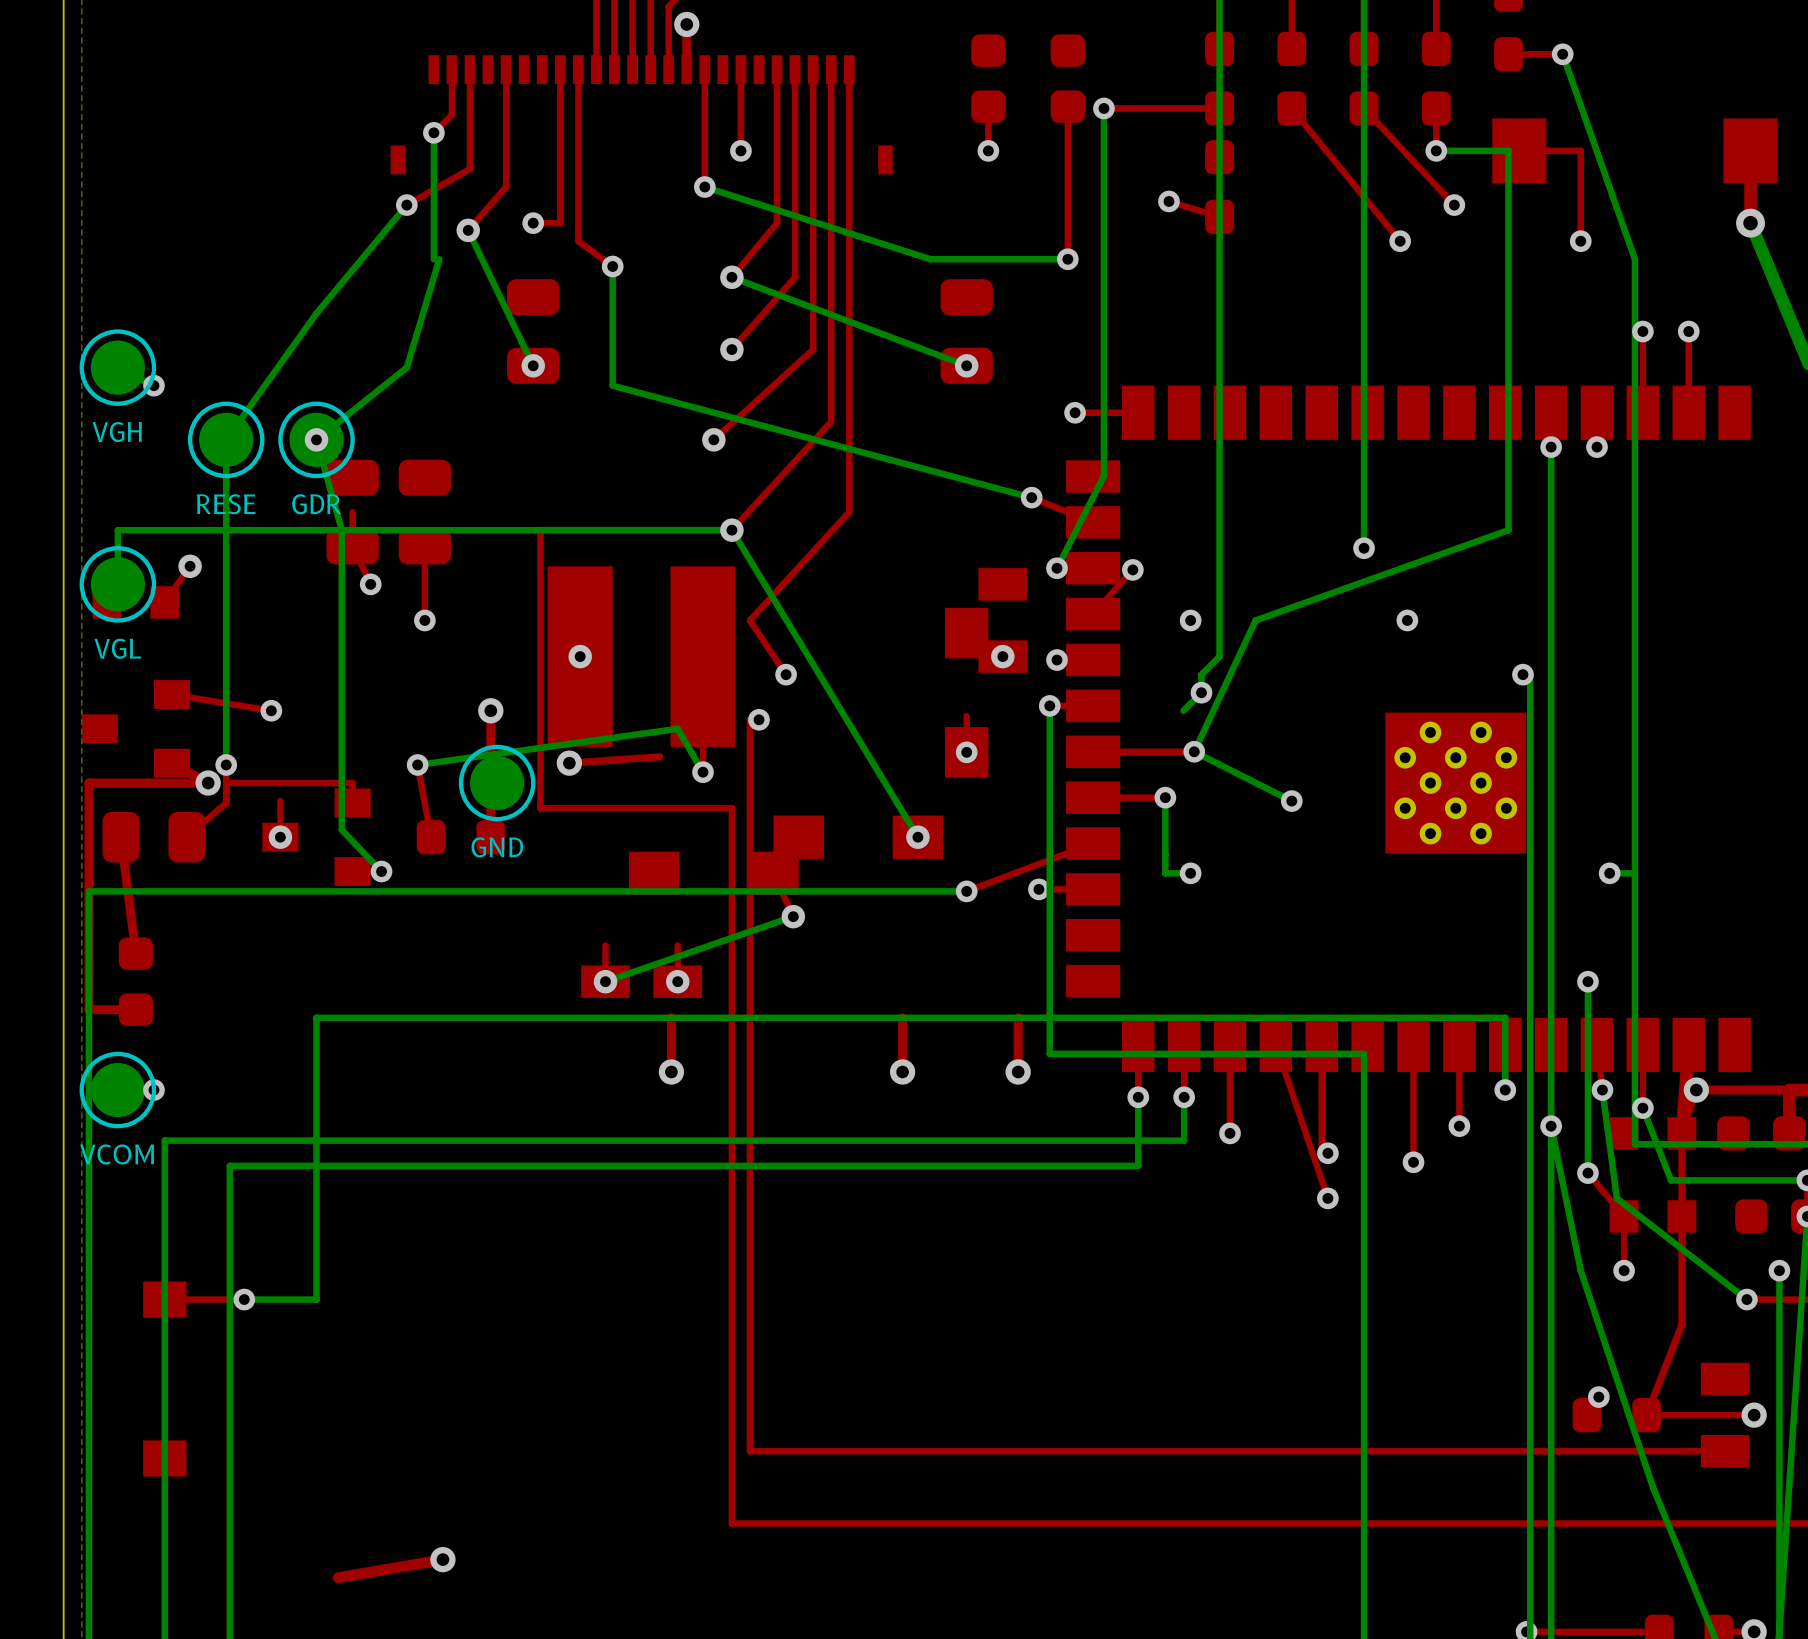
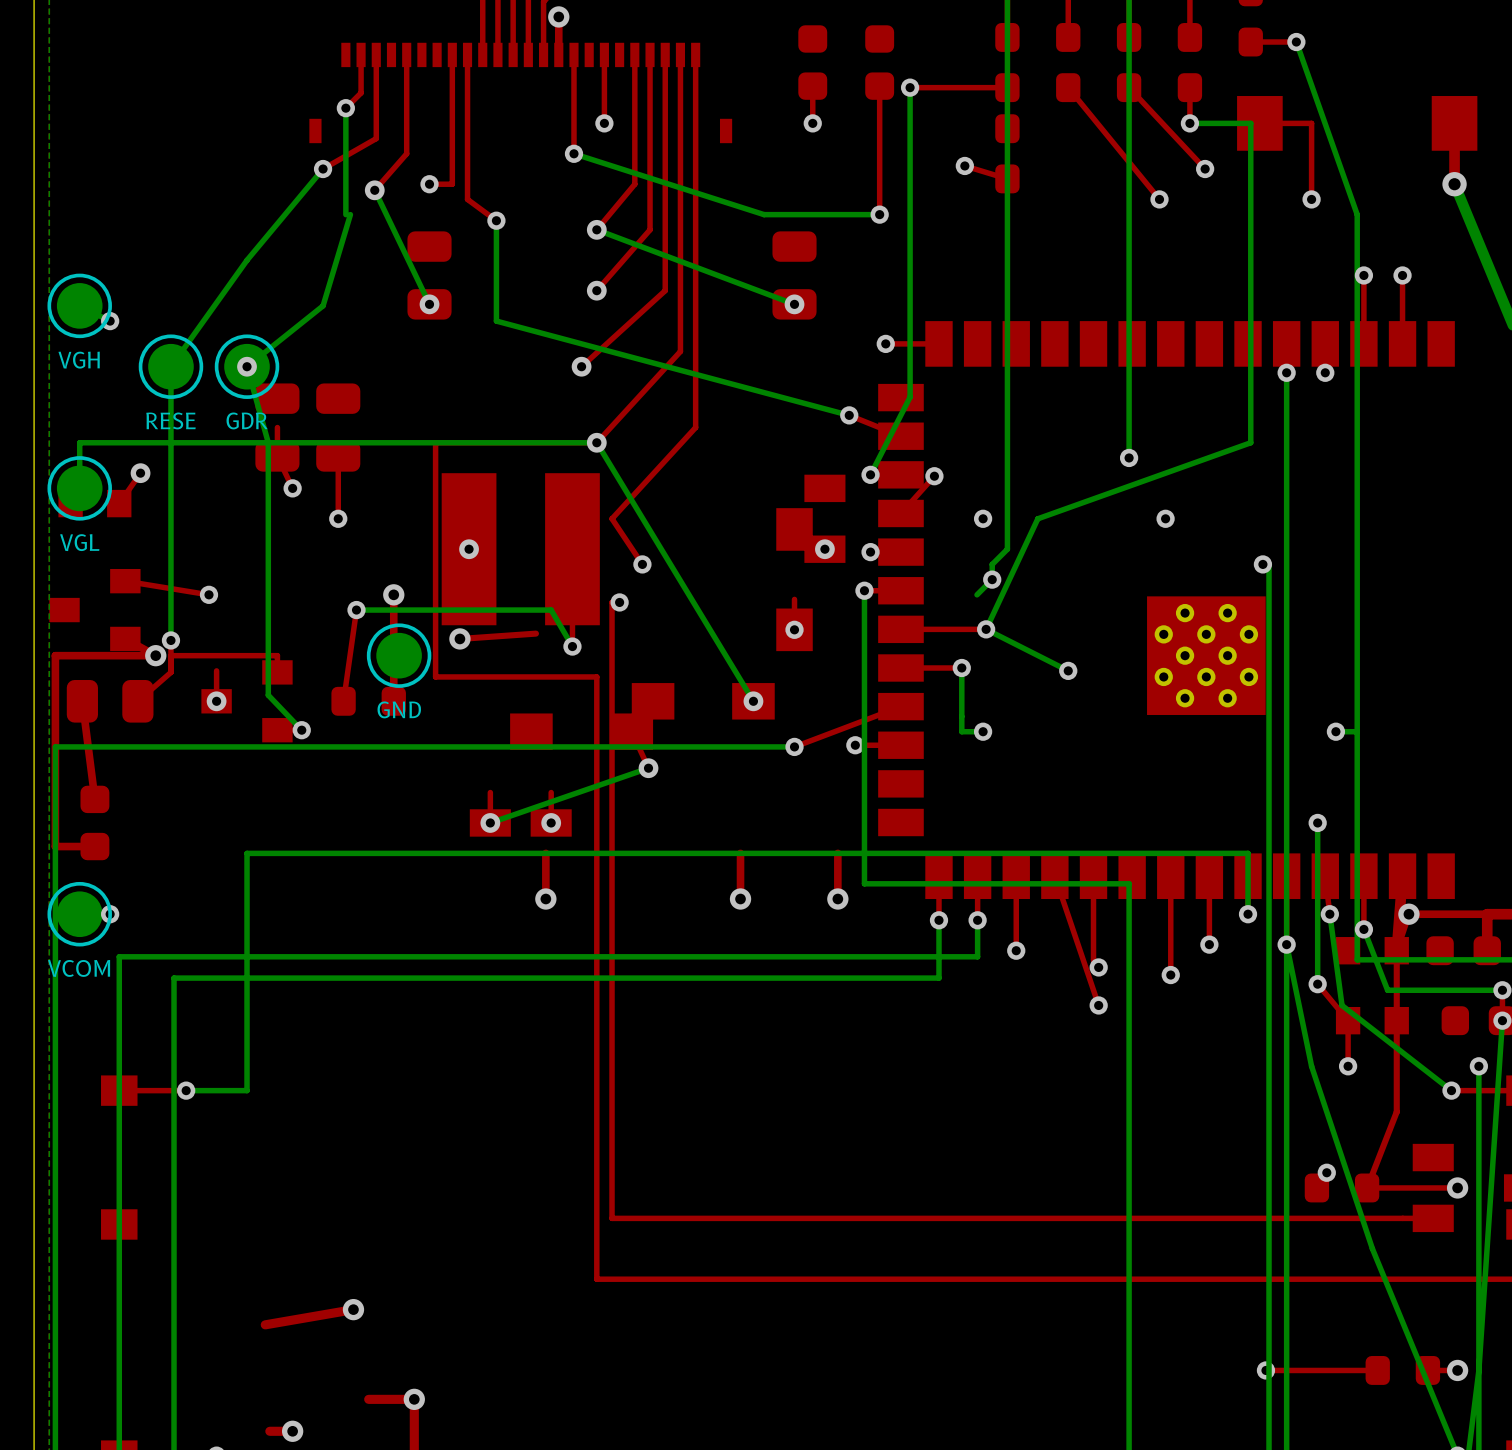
bottom track: (677, 728) (417, 764) -> (551, 610) (356, 610)
top track: (417, 764) (431, 837) -> (356, 610) (343, 701)
via position: (417, 764) -> (356, 610)

